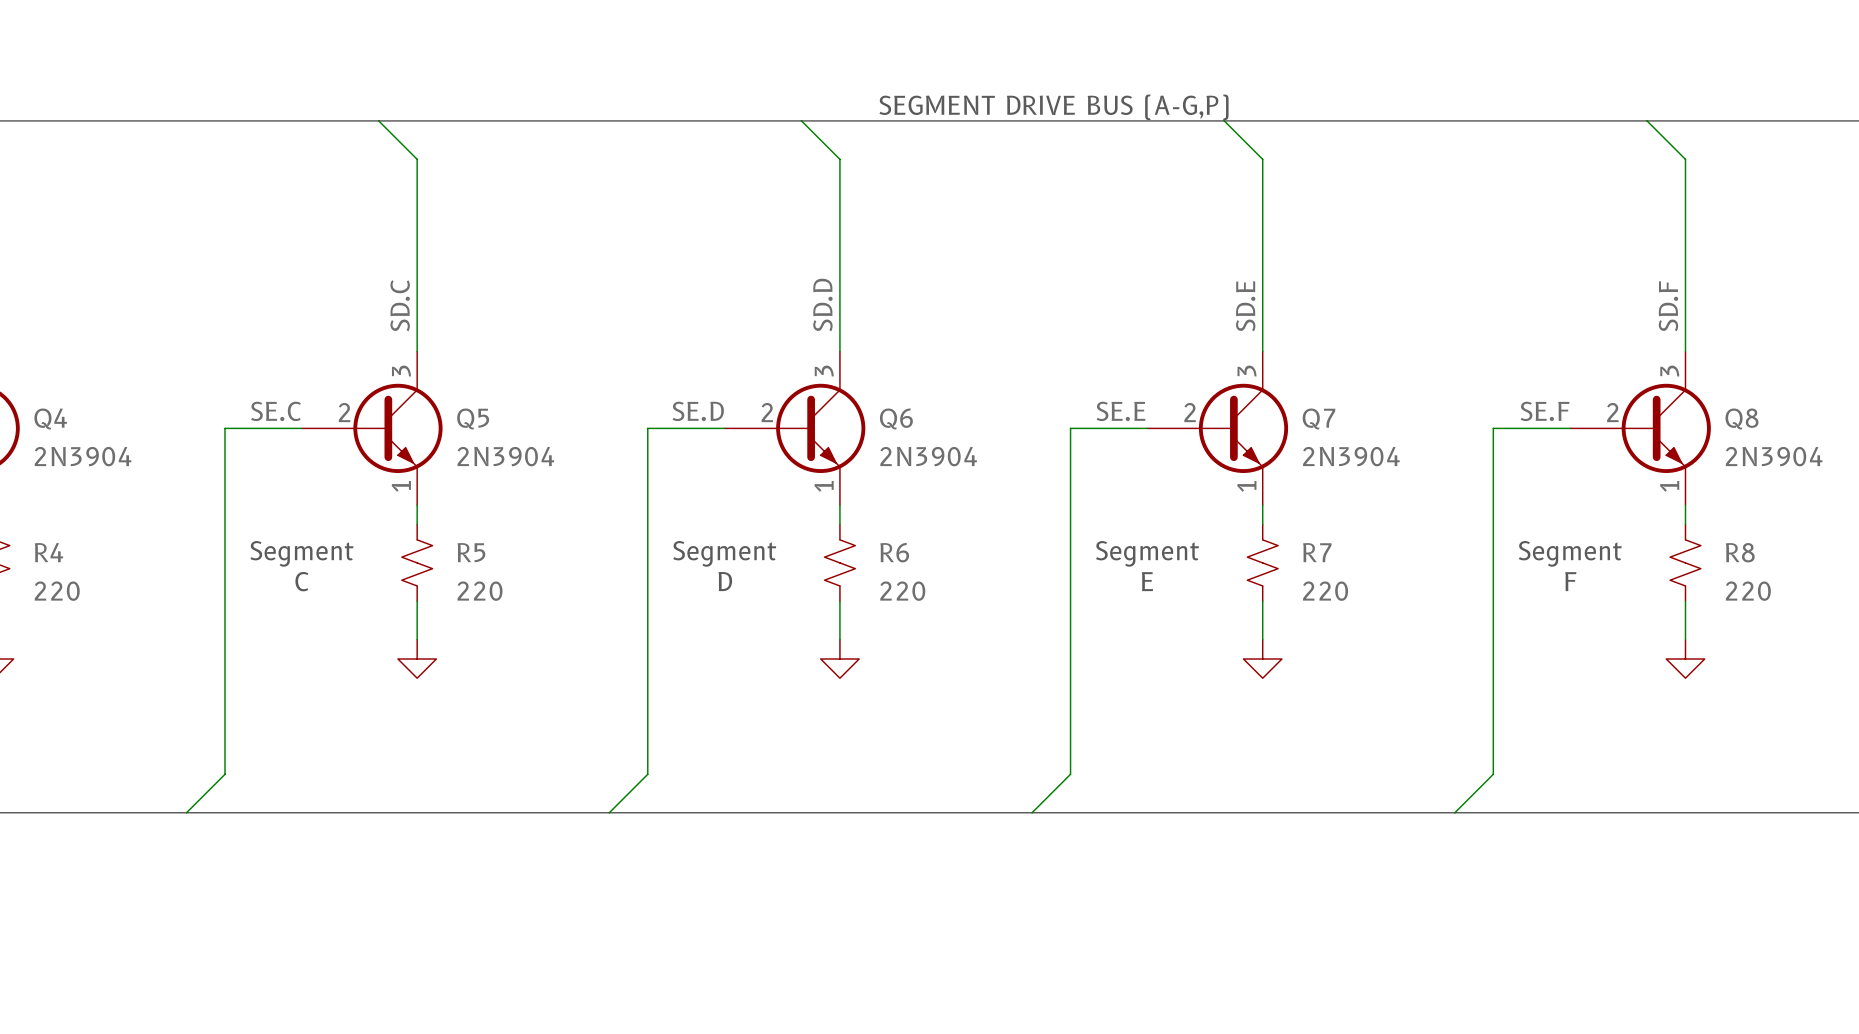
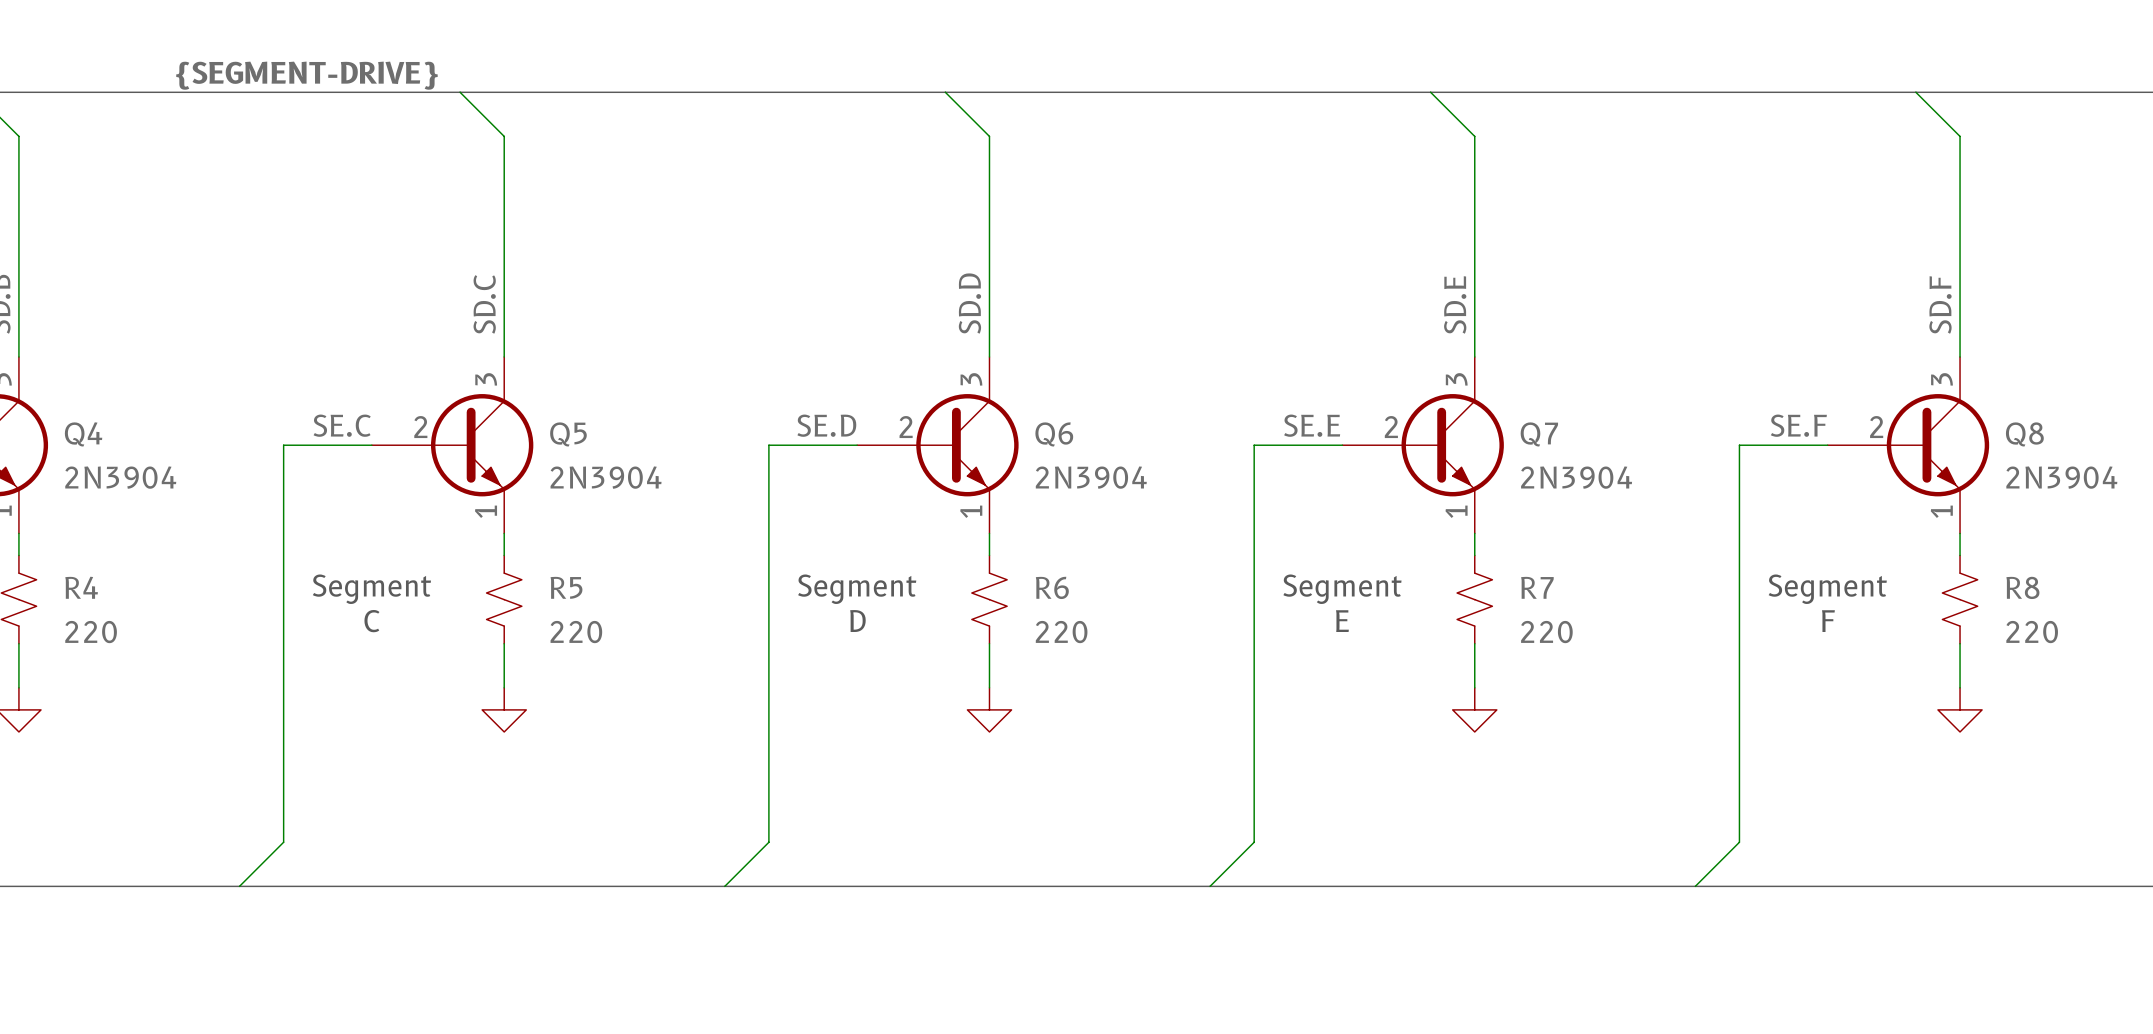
label: none -> {SEGMENT-DRIVE} (306, 75)
text: SEGMENT DRIVE BUS (A-G,P) (1053, 107) -> none

